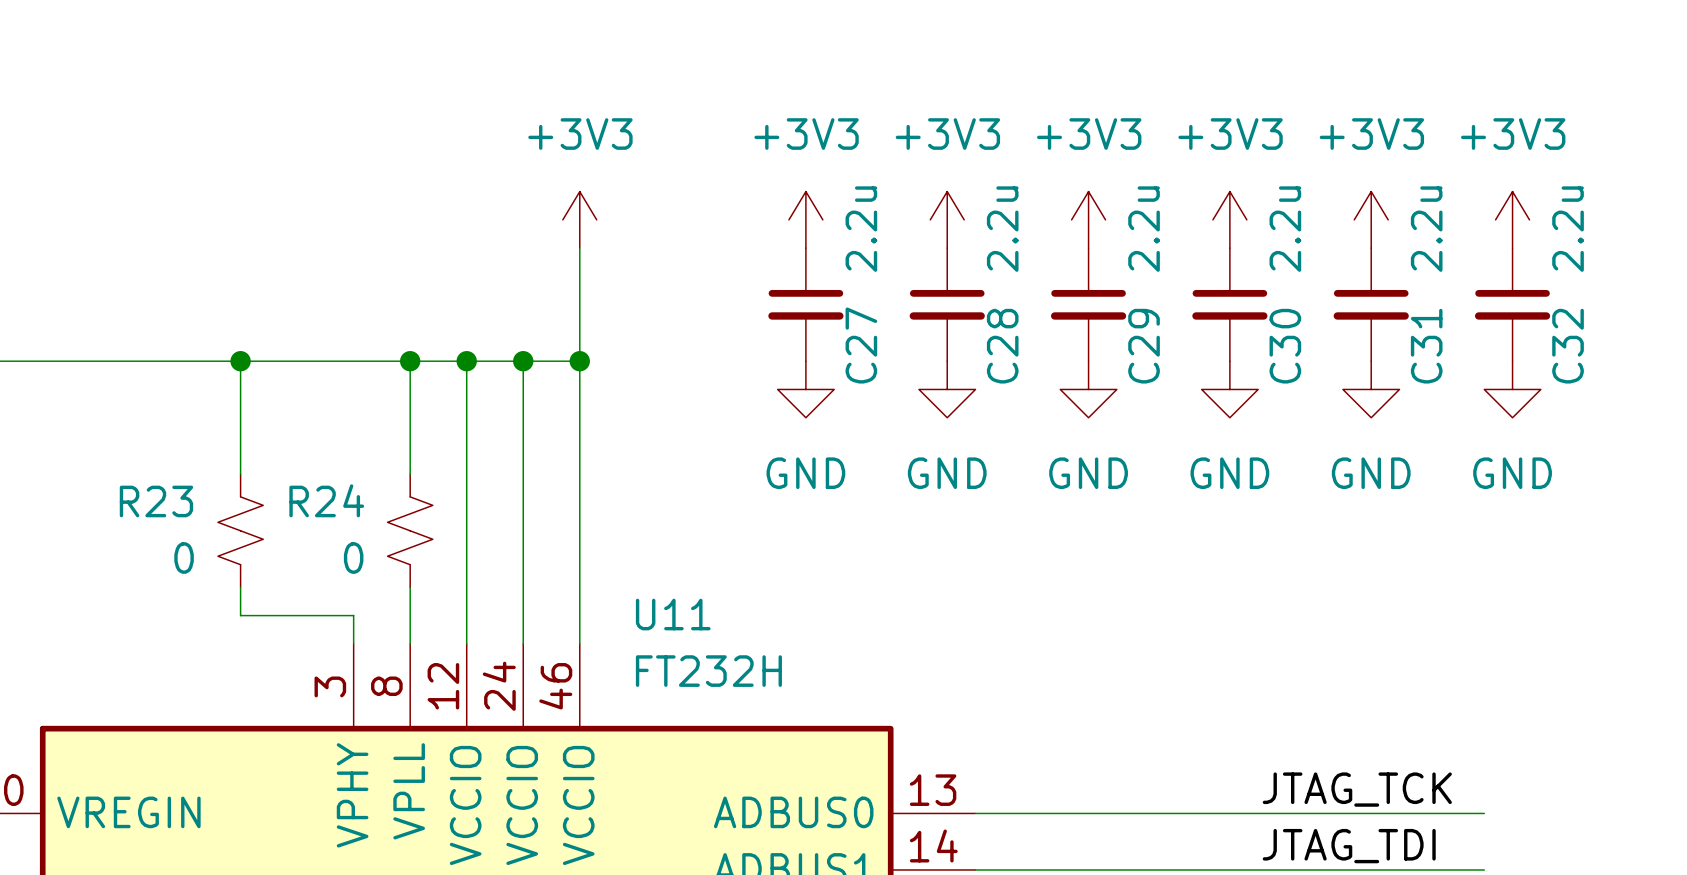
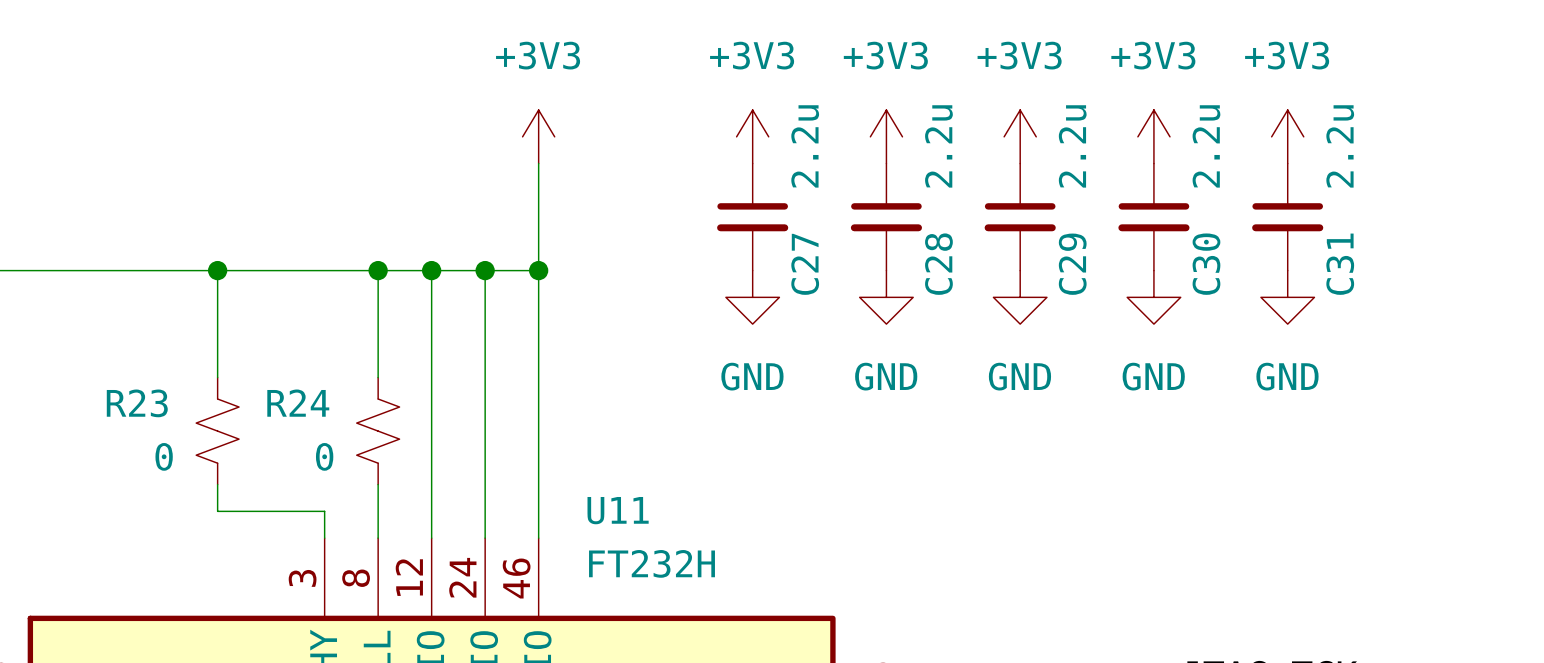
power symbol: +3V3 (1512, 219) -> none
C32: 2.2u (1512, 304) -> none
power symbol: GND (1512, 389) -> none

